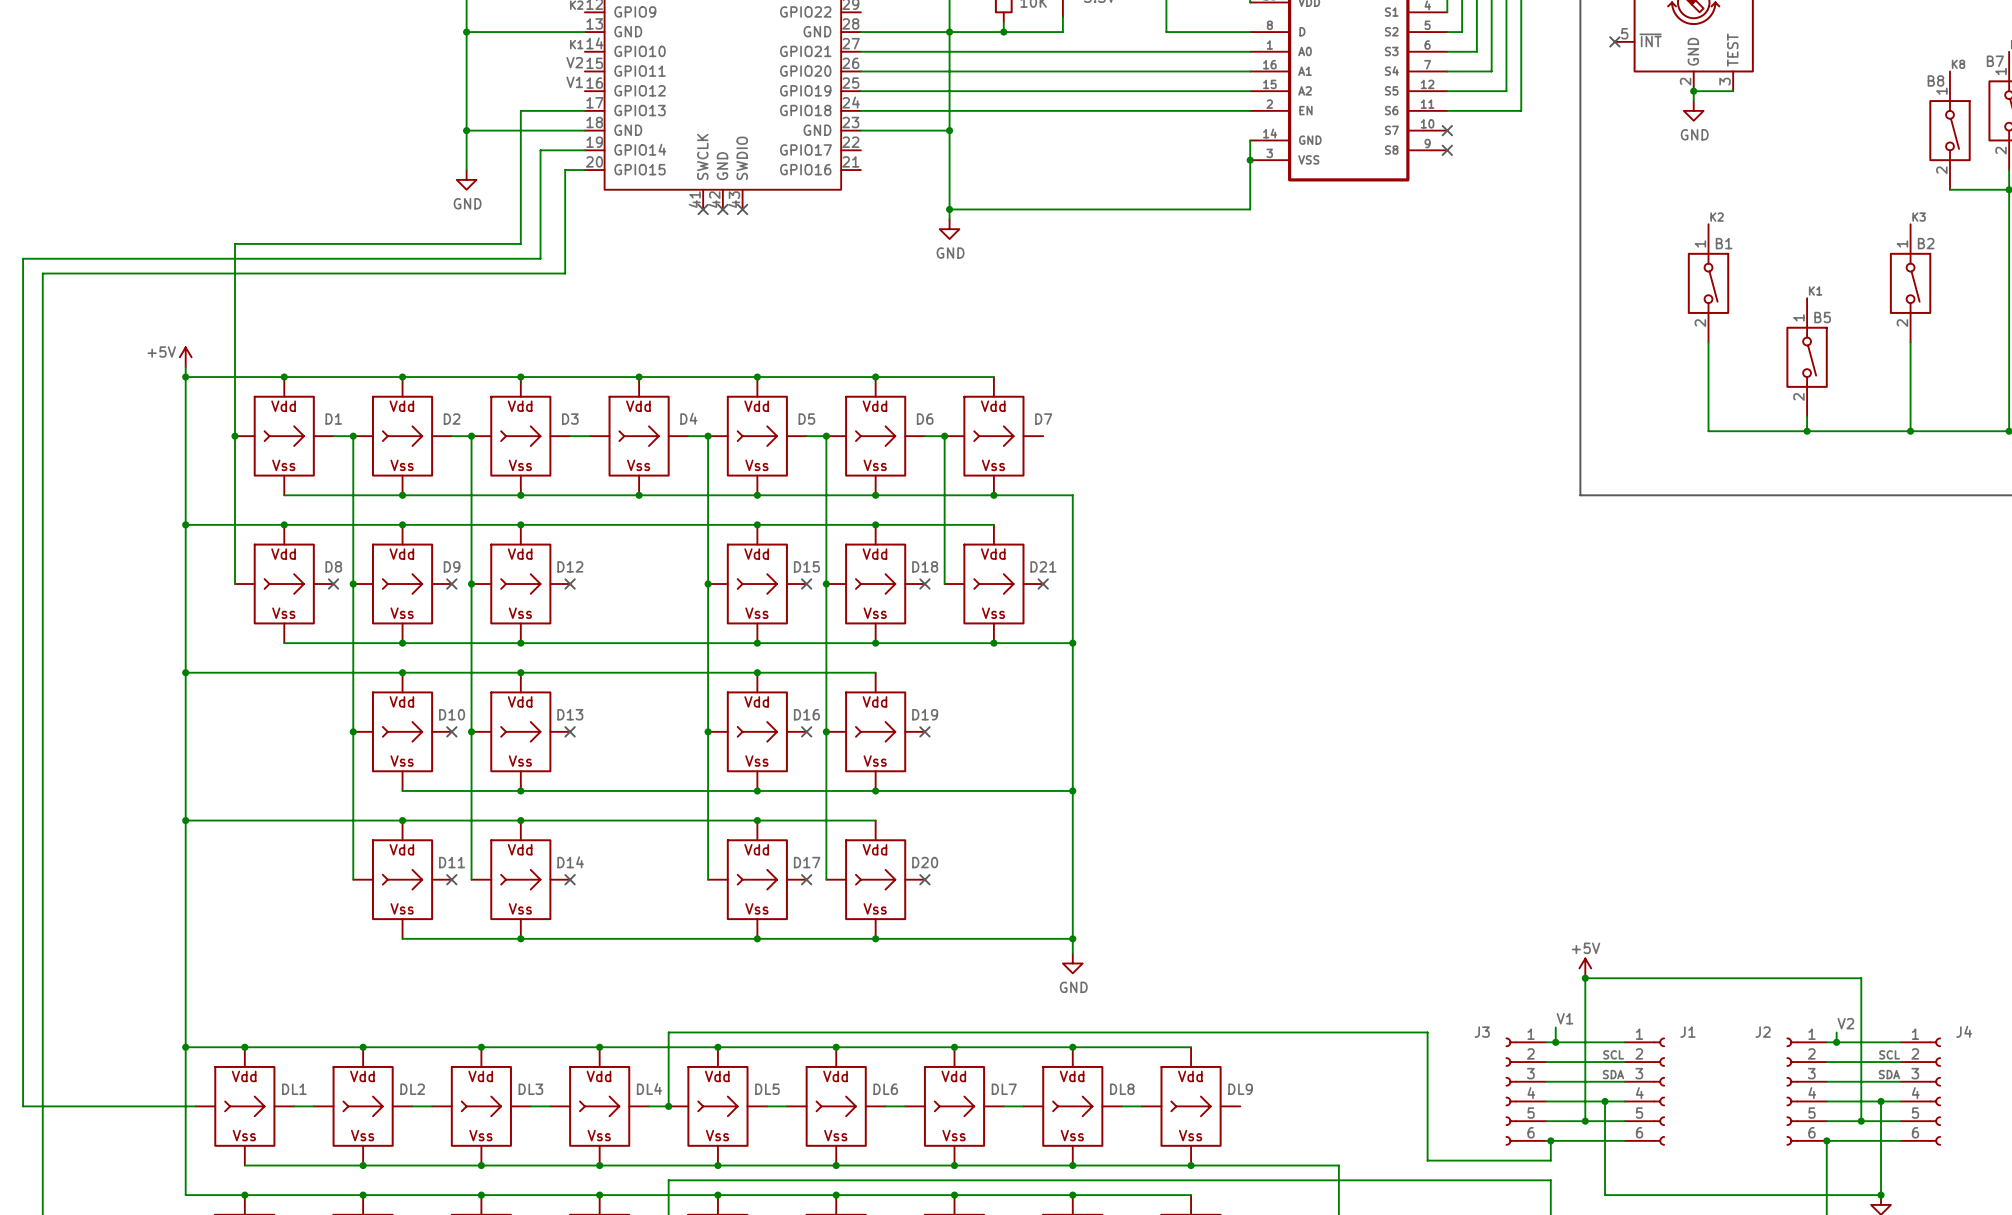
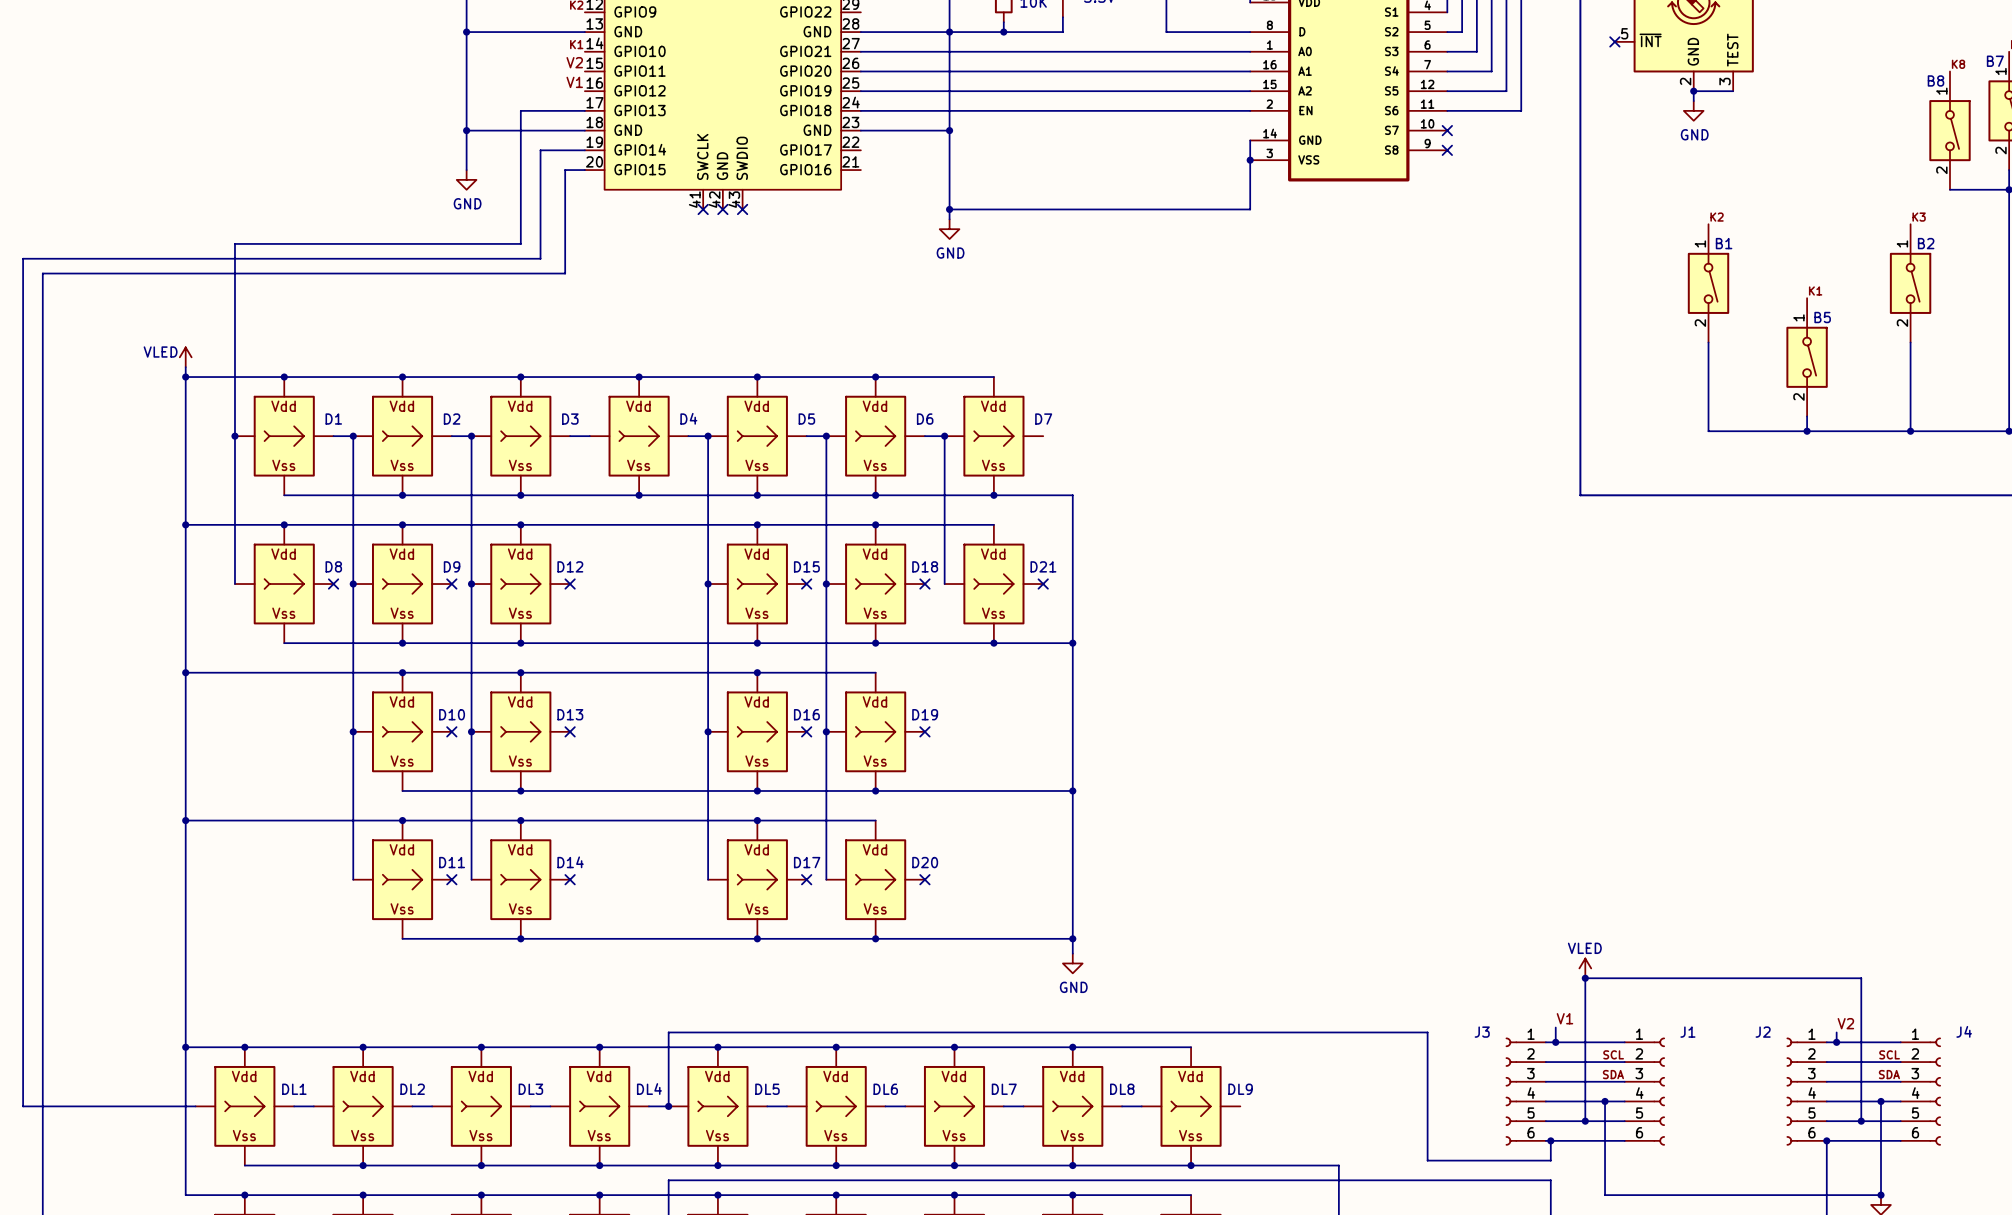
power symbol: +5V (185, 357) -> VLED (185, 357)
power symbol: +5V (1585, 968) -> VLED (1585, 968)

